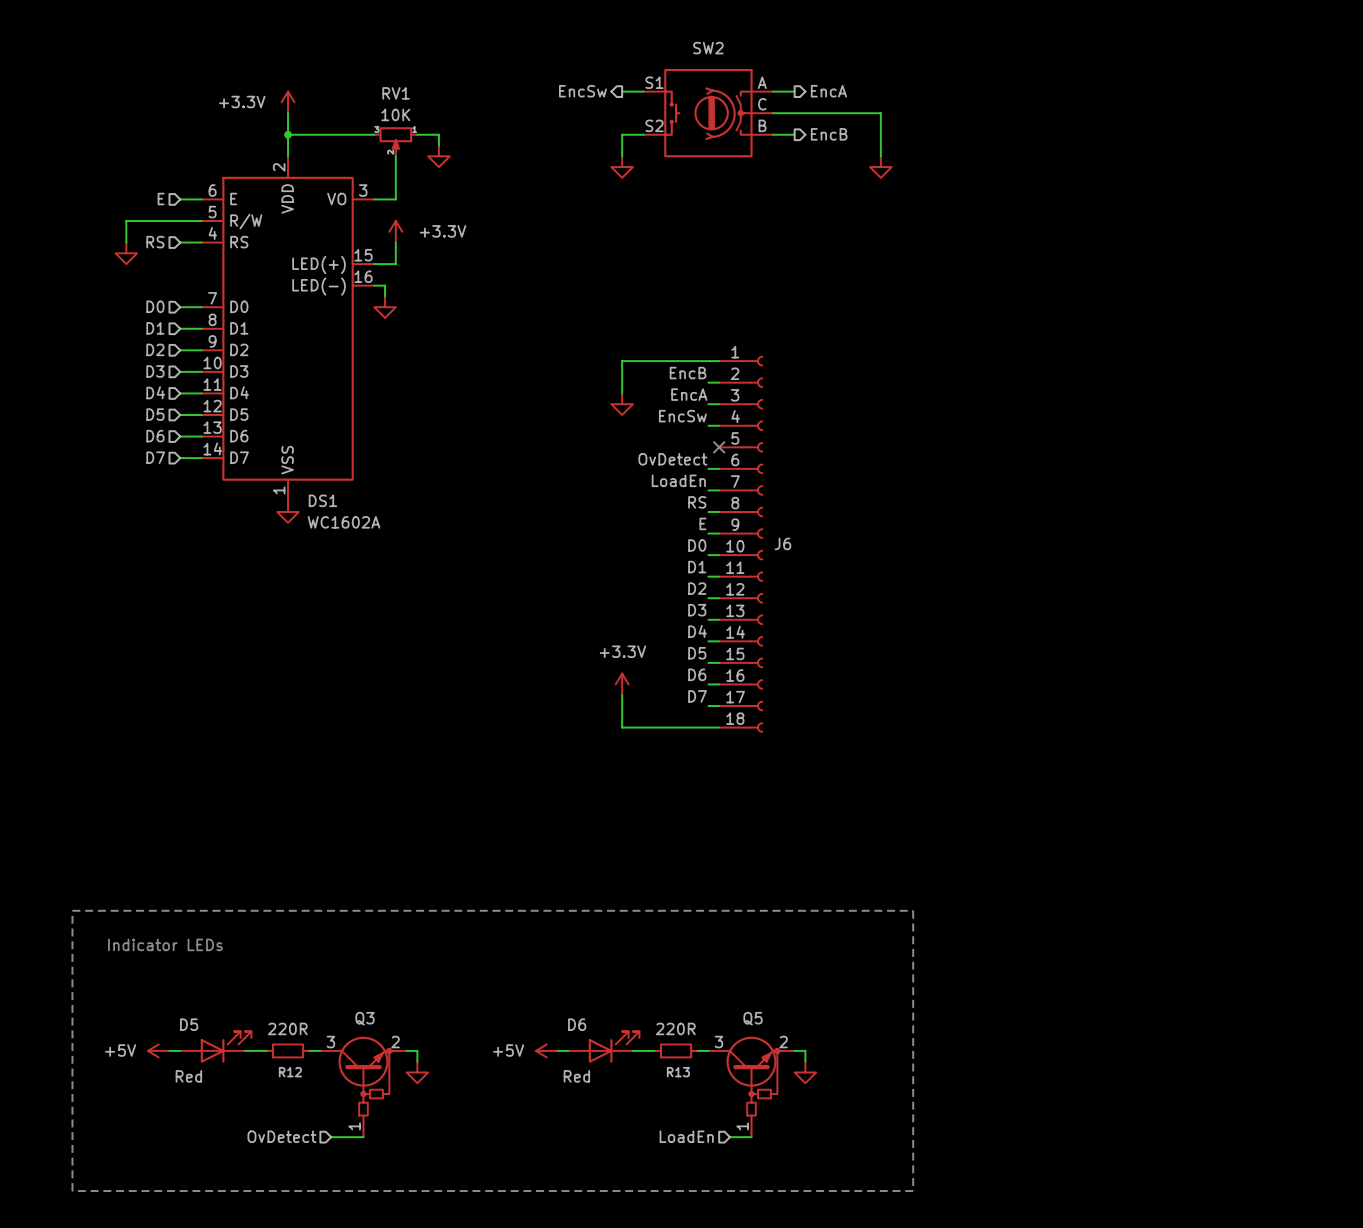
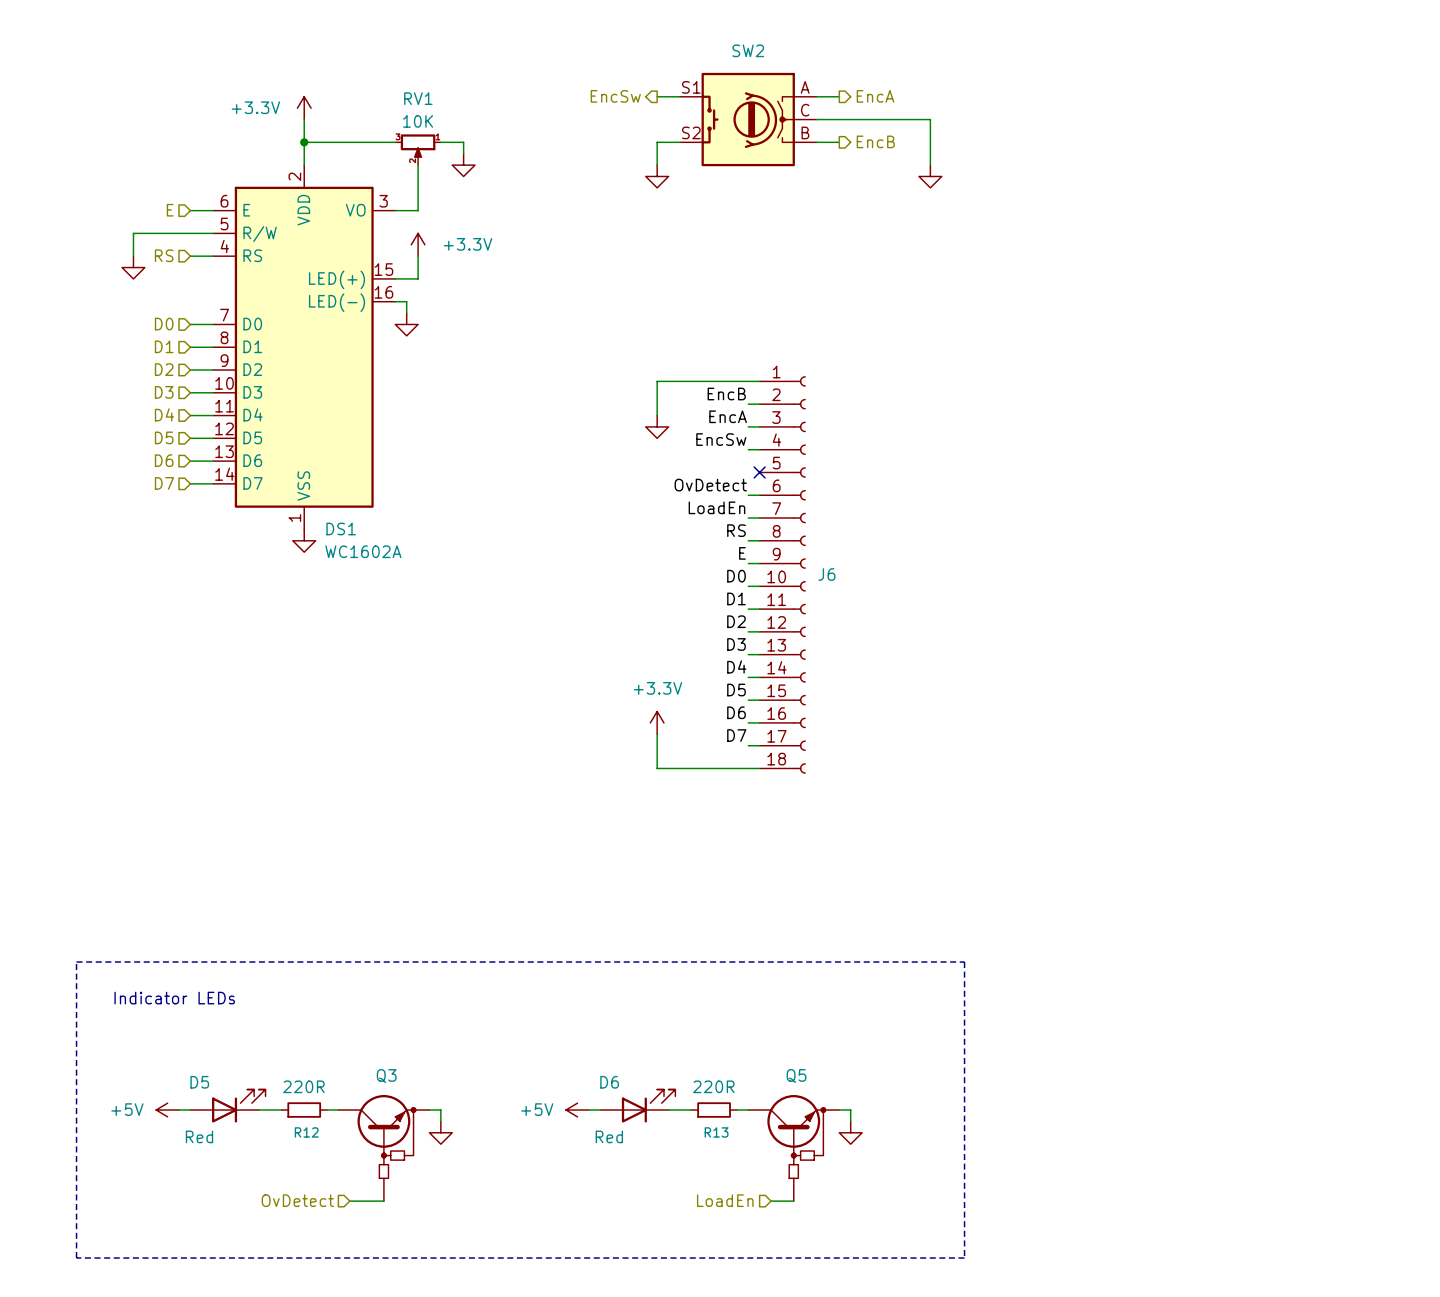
Q3 symbol: [320, 1036, 407, 1138] -> [338, 1094, 430, 1202]
Q5 symbol: [708, 1036, 795, 1138] -> [748, 1094, 840, 1202]

